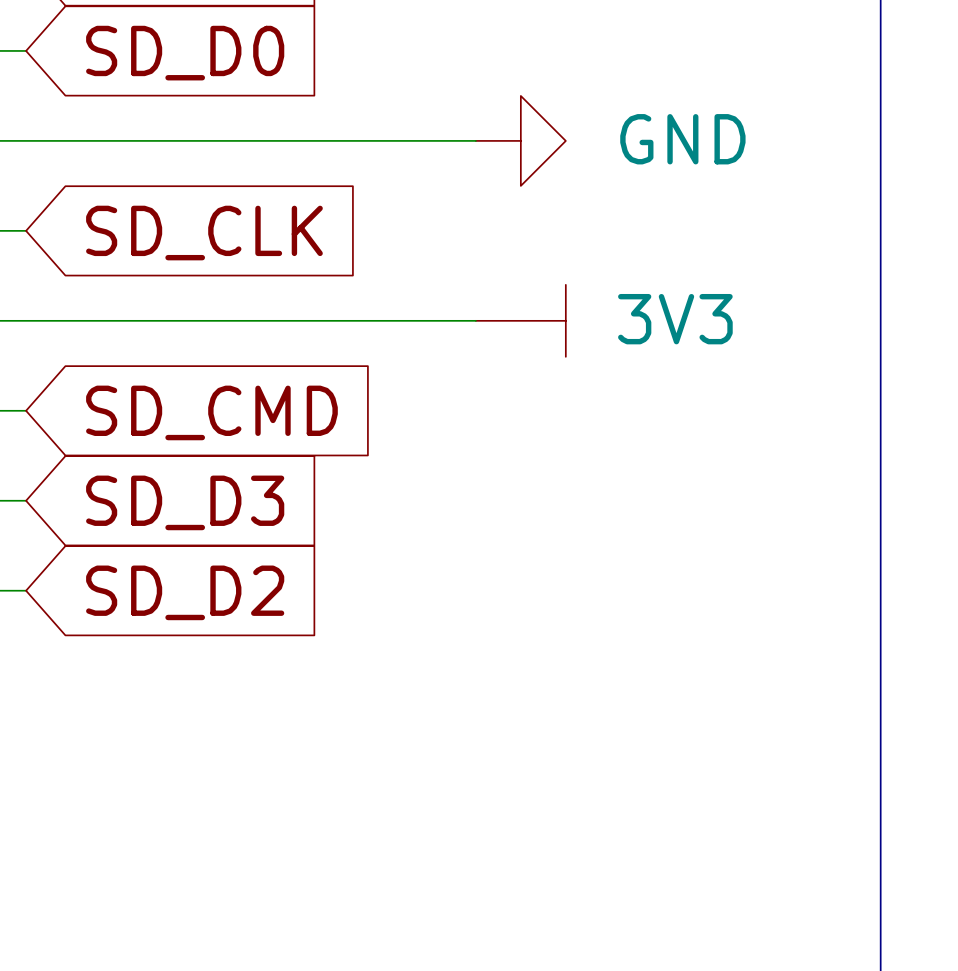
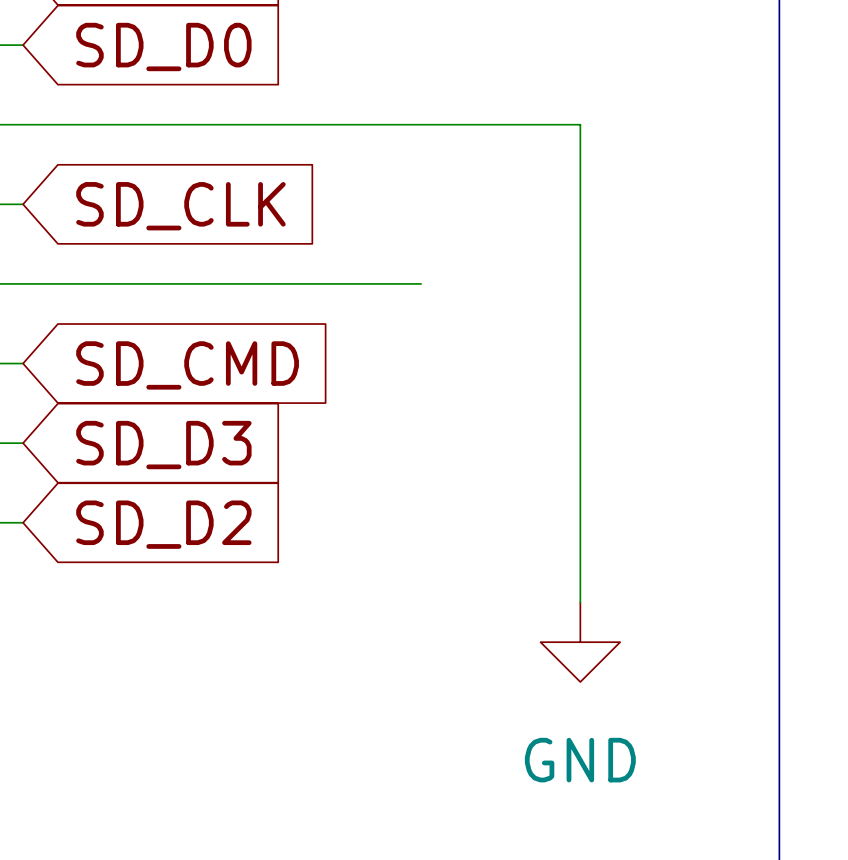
wire: none -> (421, 124) (580, 124) (580, 602)
power symbol rotation: 0° (520, 140) -> 90° clockwise (580, 642)
power symbol position: GND (520, 140) -> GND (580, 642)
power symbol: 3V3 (520, 320) -> none

